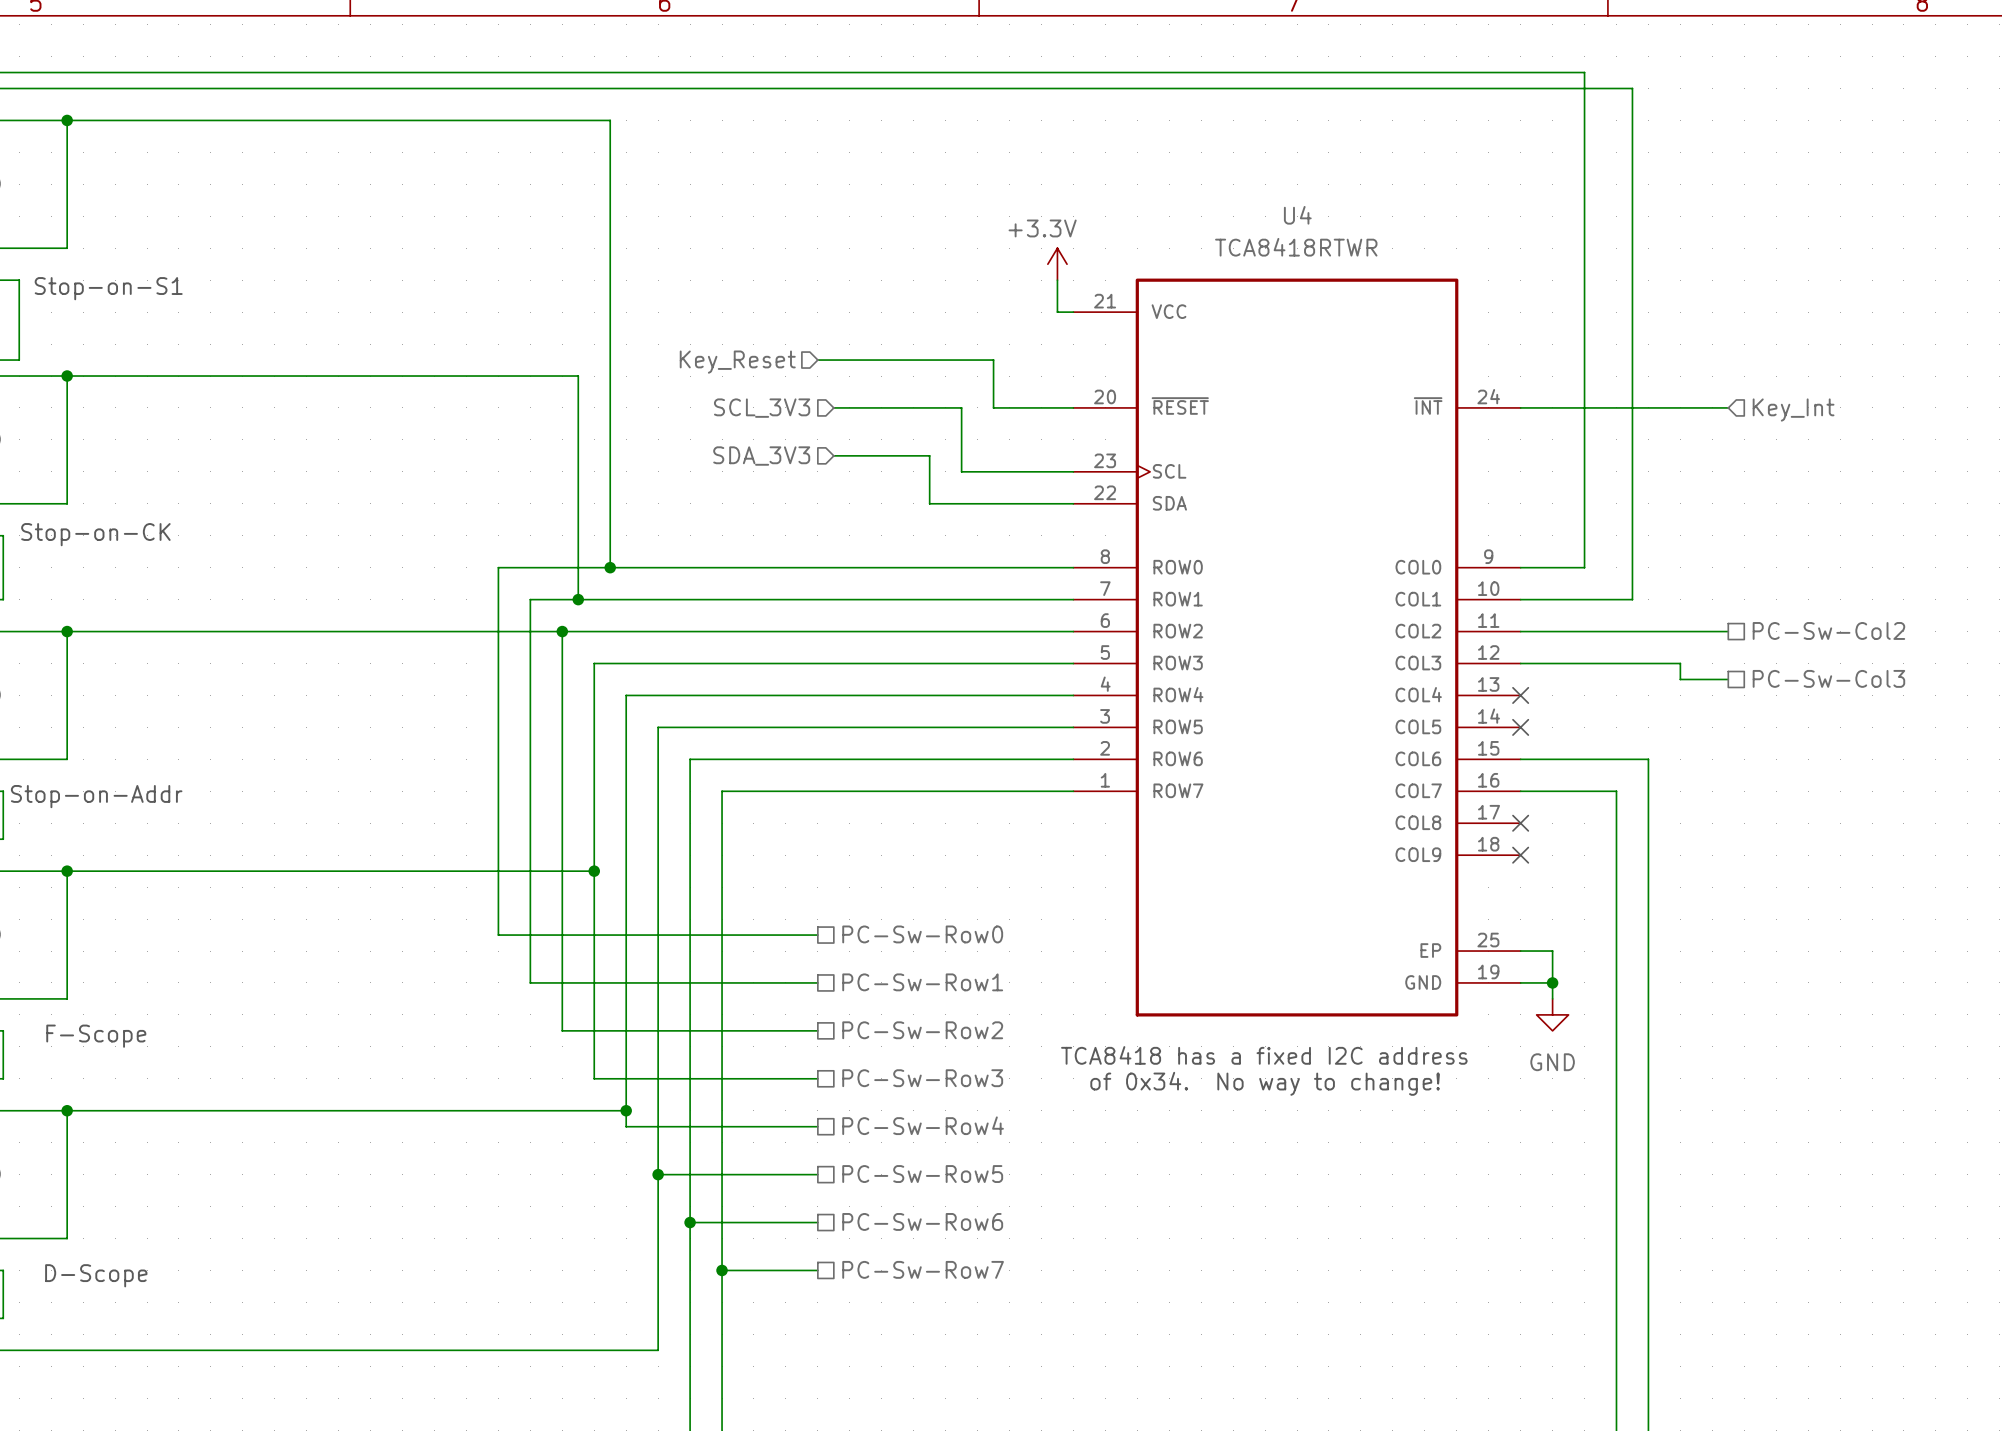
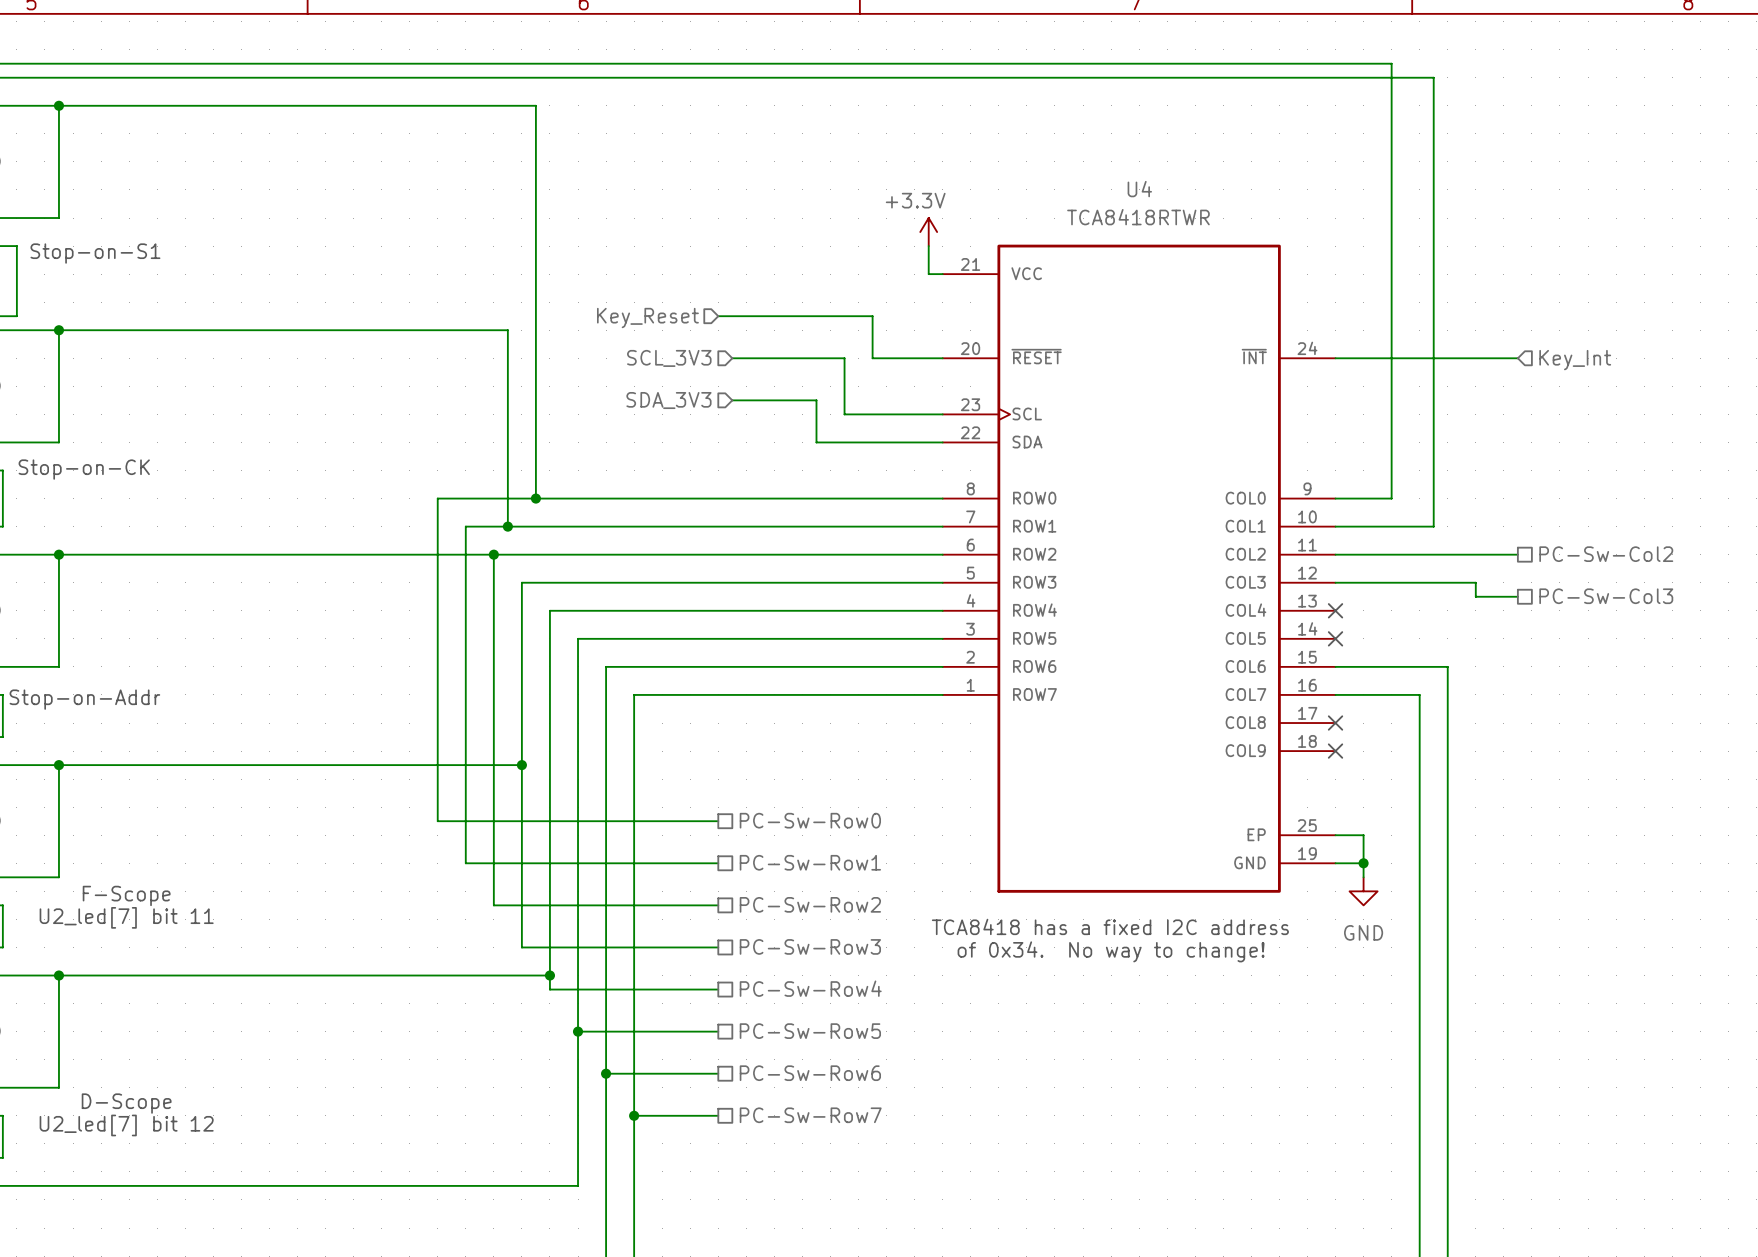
text position: F-Scope (96, 1036) -> F-Scope (126, 895)
text: none -> U2_led[7] bit 11 (126, 917)
text position: D-Scope (96, 1275) -> D-Scope (126, 1103)
text: none -> U2_led[7] bit 12 (126, 1125)

